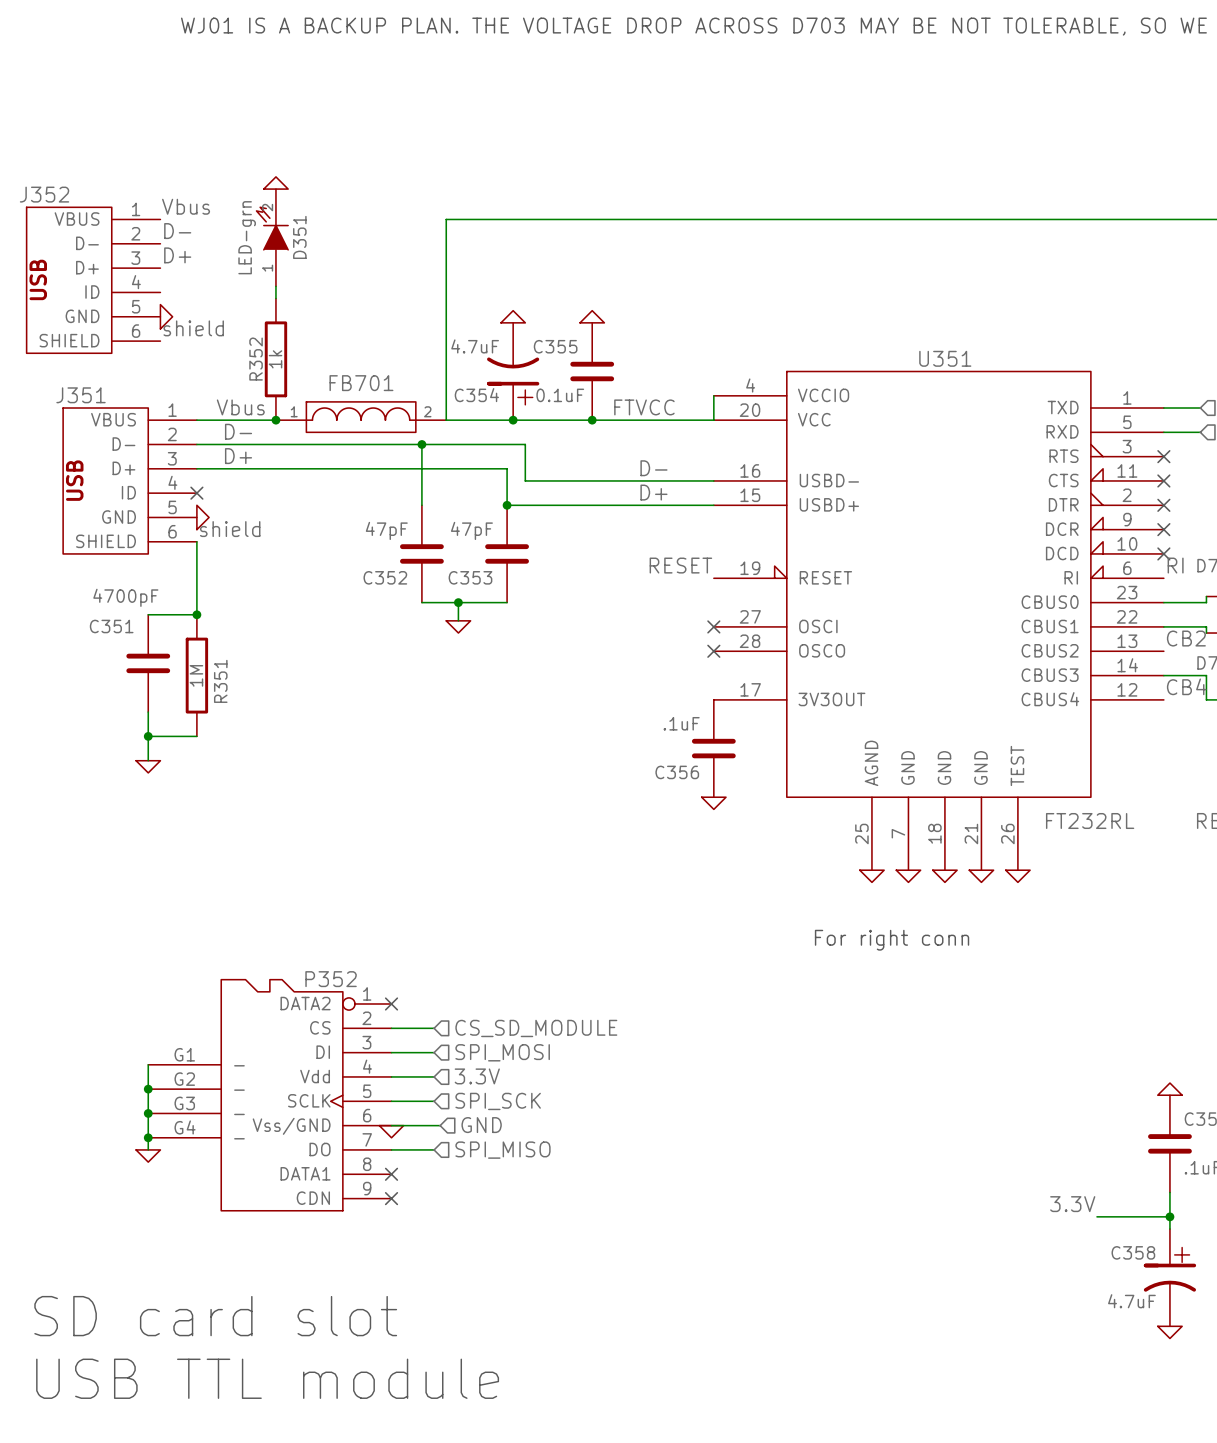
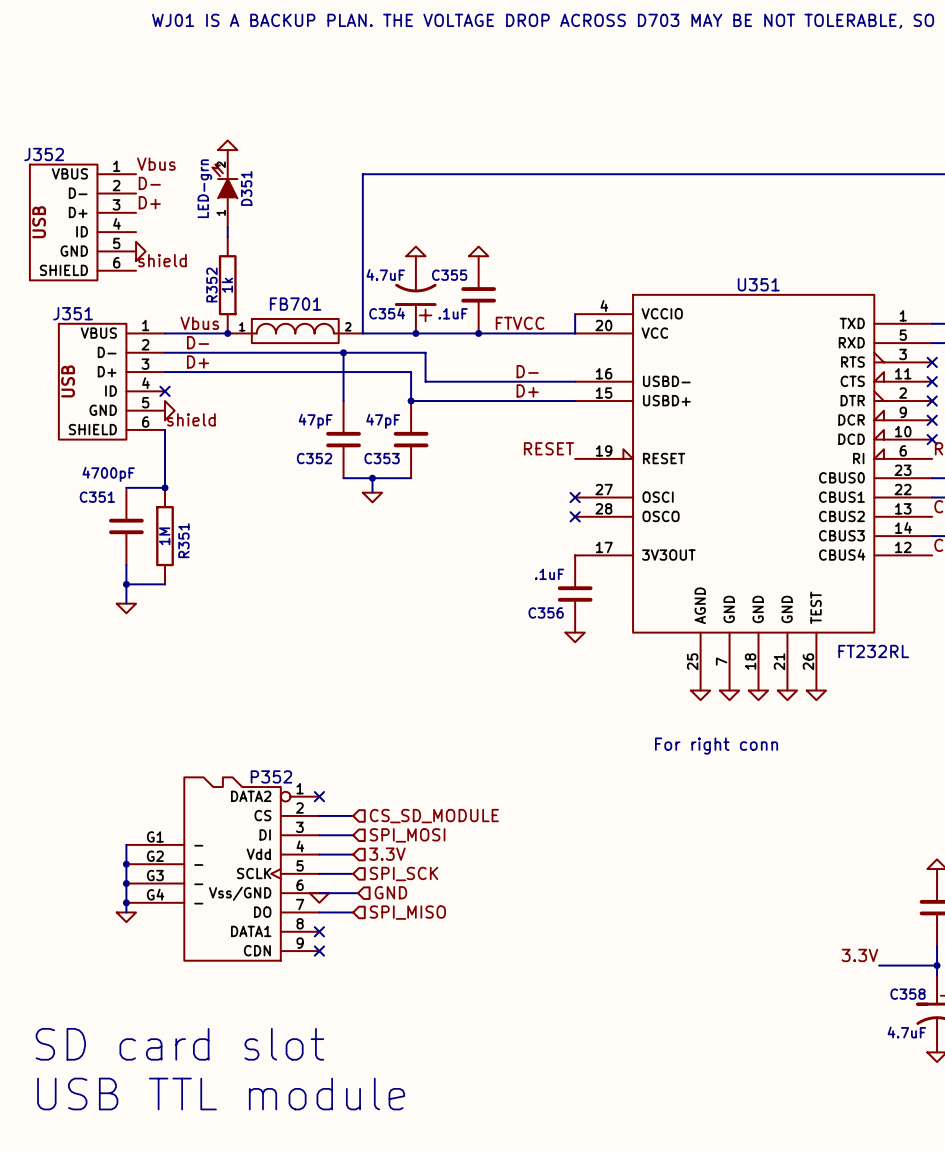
C355 value: 0.1uF (560, 395) -> .1uF (453, 313)

